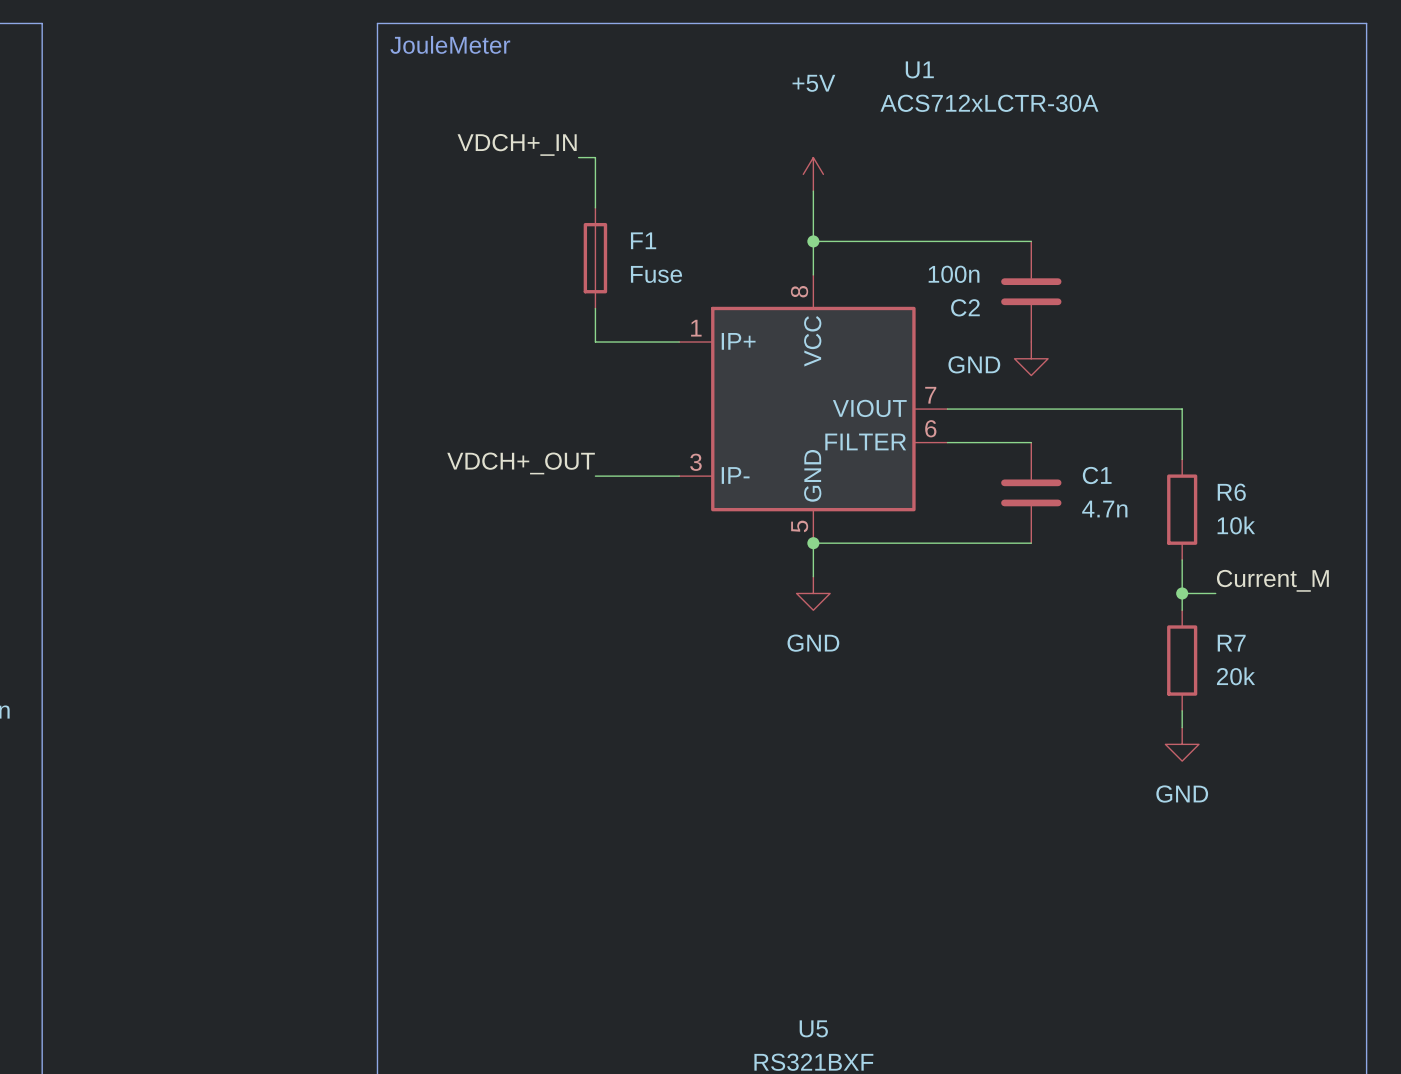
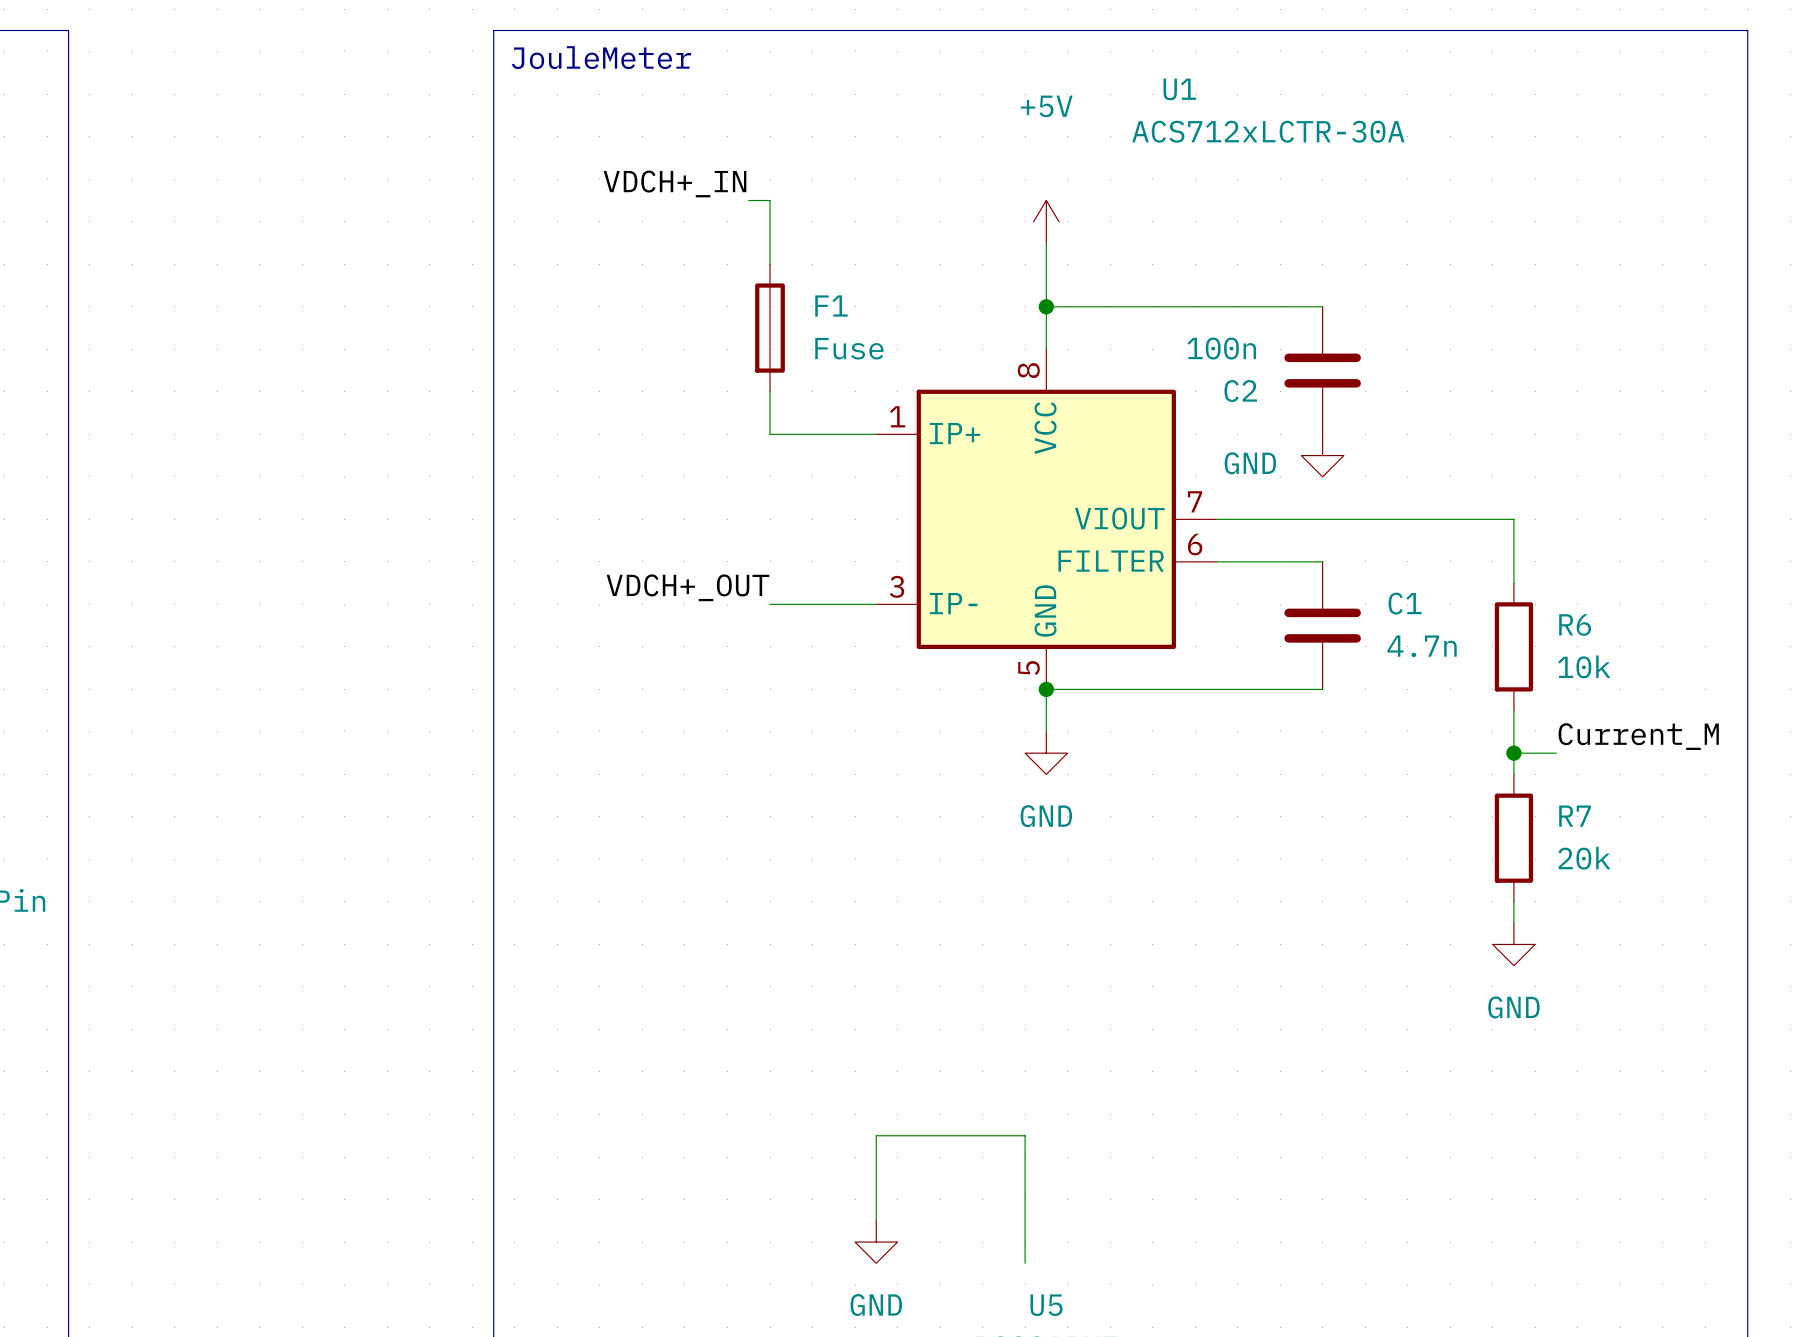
wire: none -> (876, 1220) (876, 1135) (1025, 1135) (1025, 1263)
power symbol: none -> GND (876, 1242)

